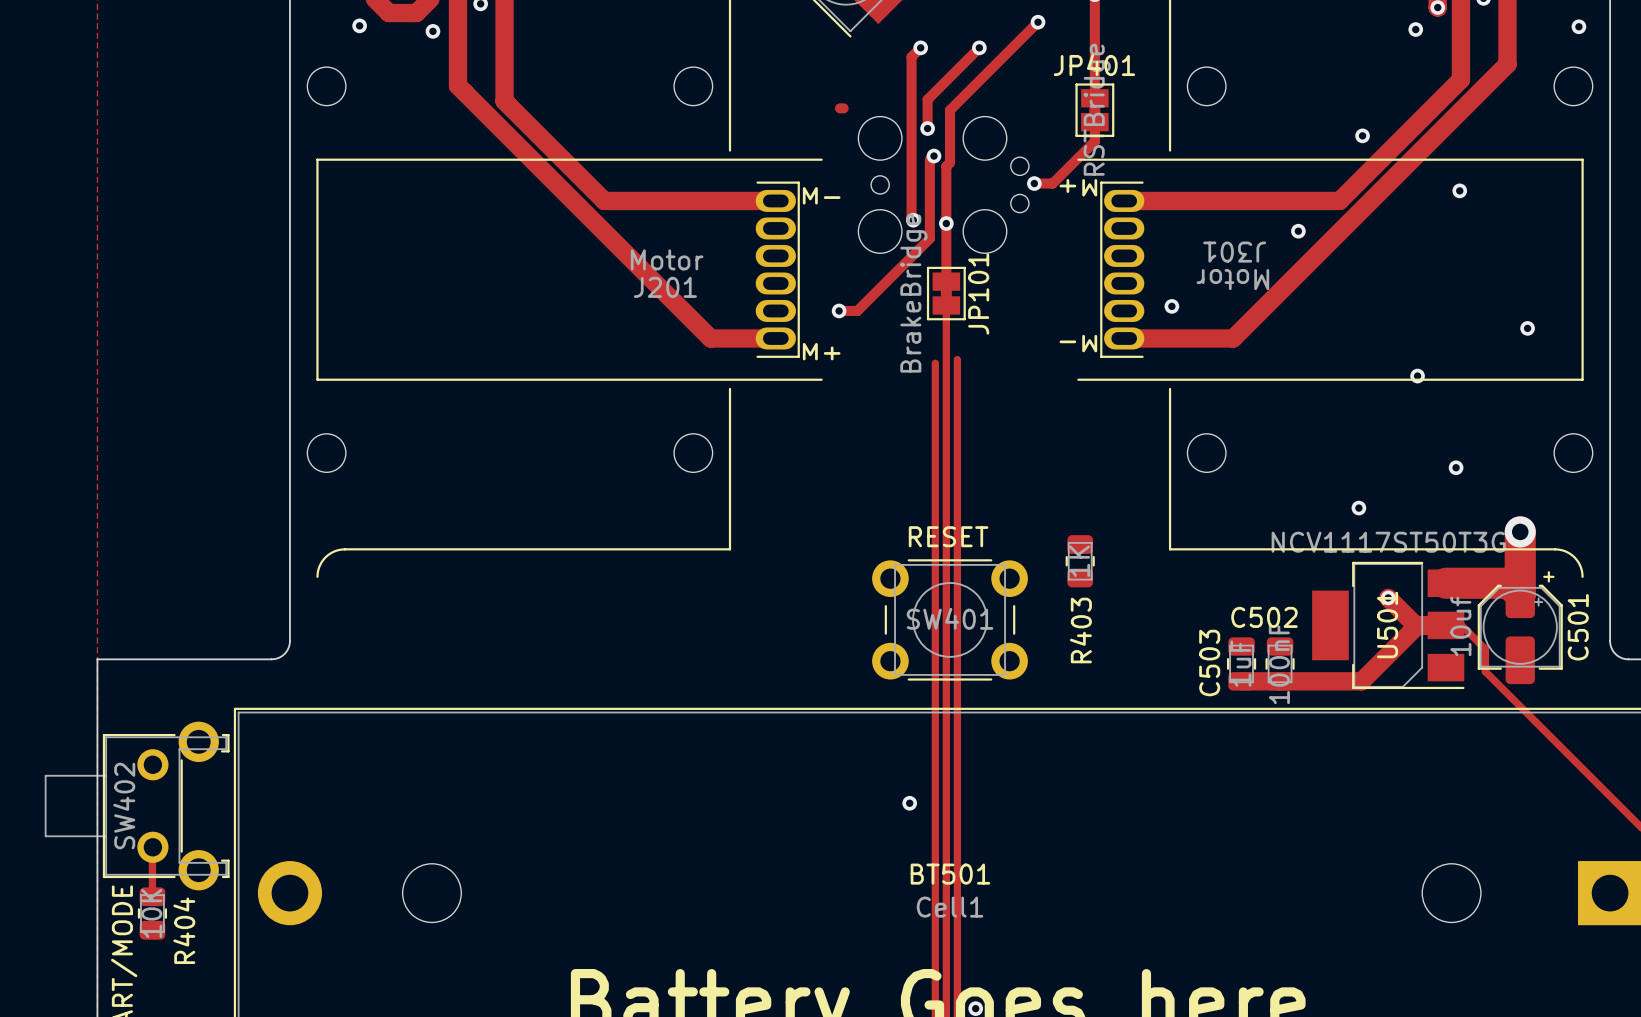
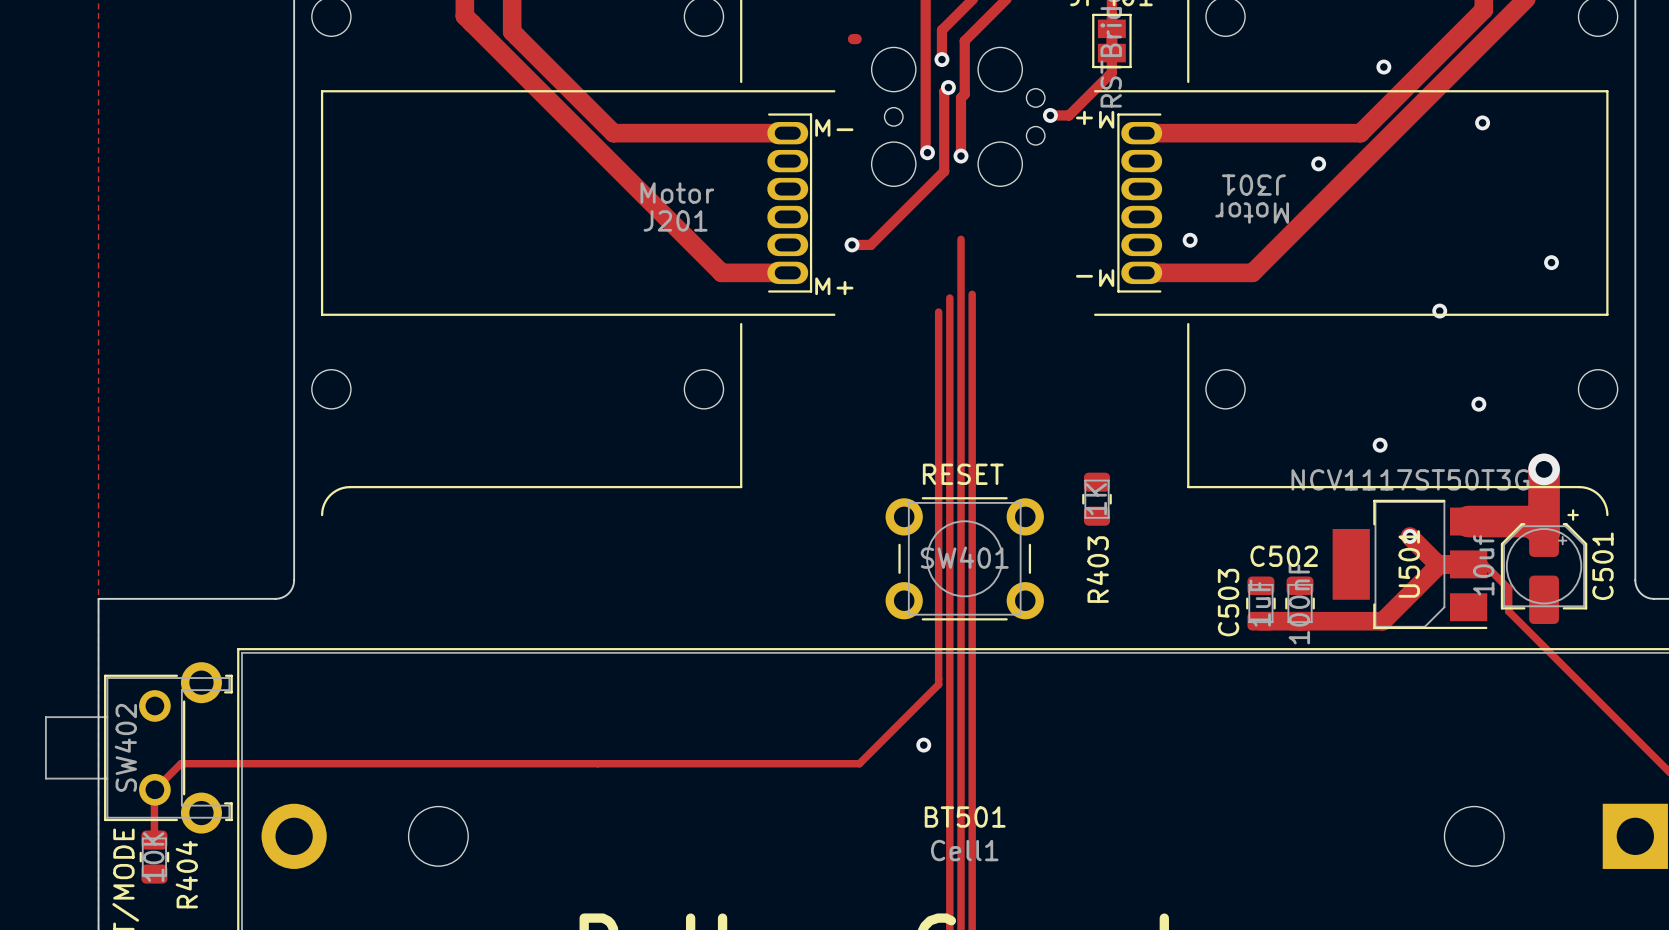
track: (946, 223) (946, 281) -> none
JP101: BrakeBridge (946, 293) -> none
track: none -> (938, 311) (938, 684) (859, 763) (180, 763) (154, 789)

